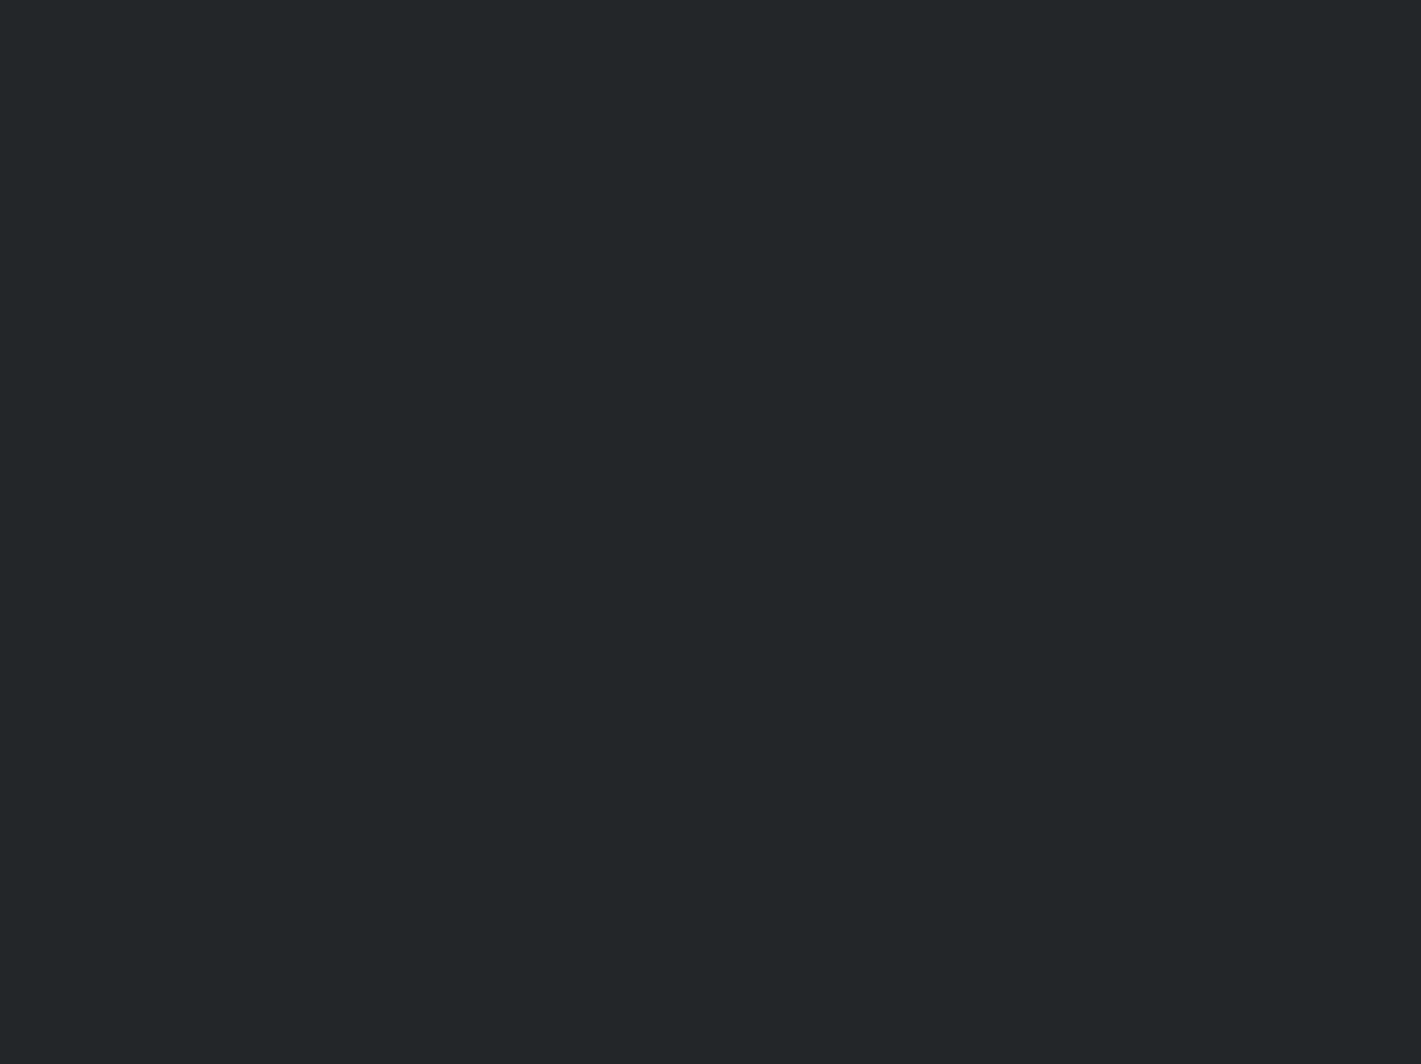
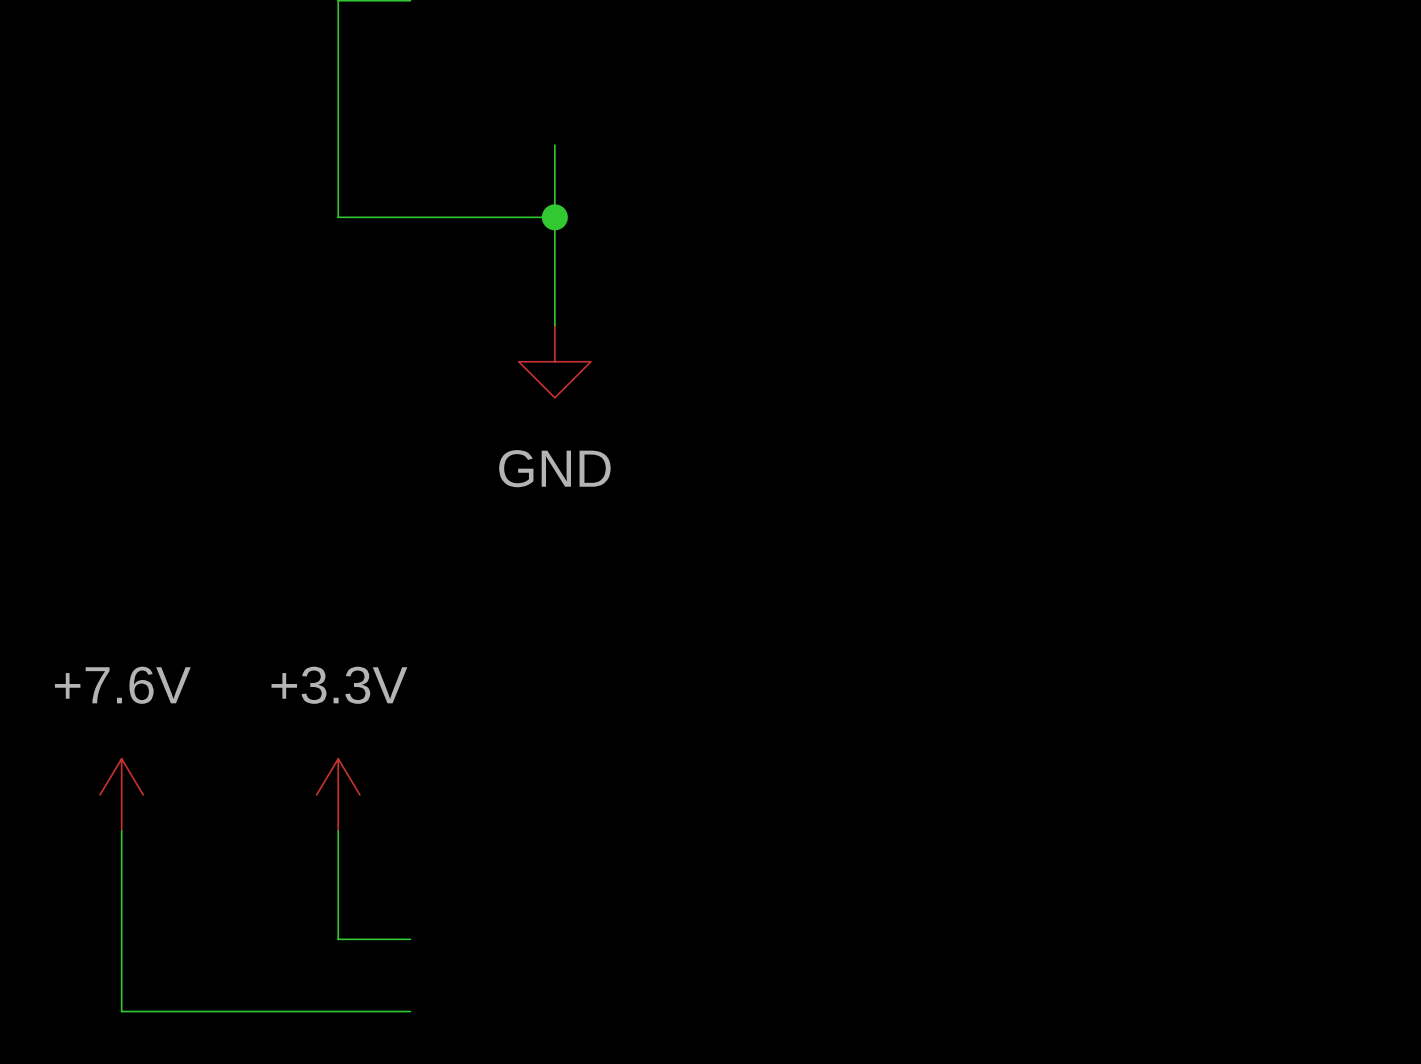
wire: none -> (410, 0) (338, 0) (338, 217) (554, 217)
wire: none -> (554, 145) (554, 325)
junction: none -> (554, 217)
power symbol: none -> GND (554, 361)
power symbol: none -> +7.6V (121, 794)
power symbol: none -> +3.3V (338, 794)
wire: none -> (121, 831) (121, 1011) (410, 1011)
wire: none -> (338, 831) (338, 939) (410, 939)

